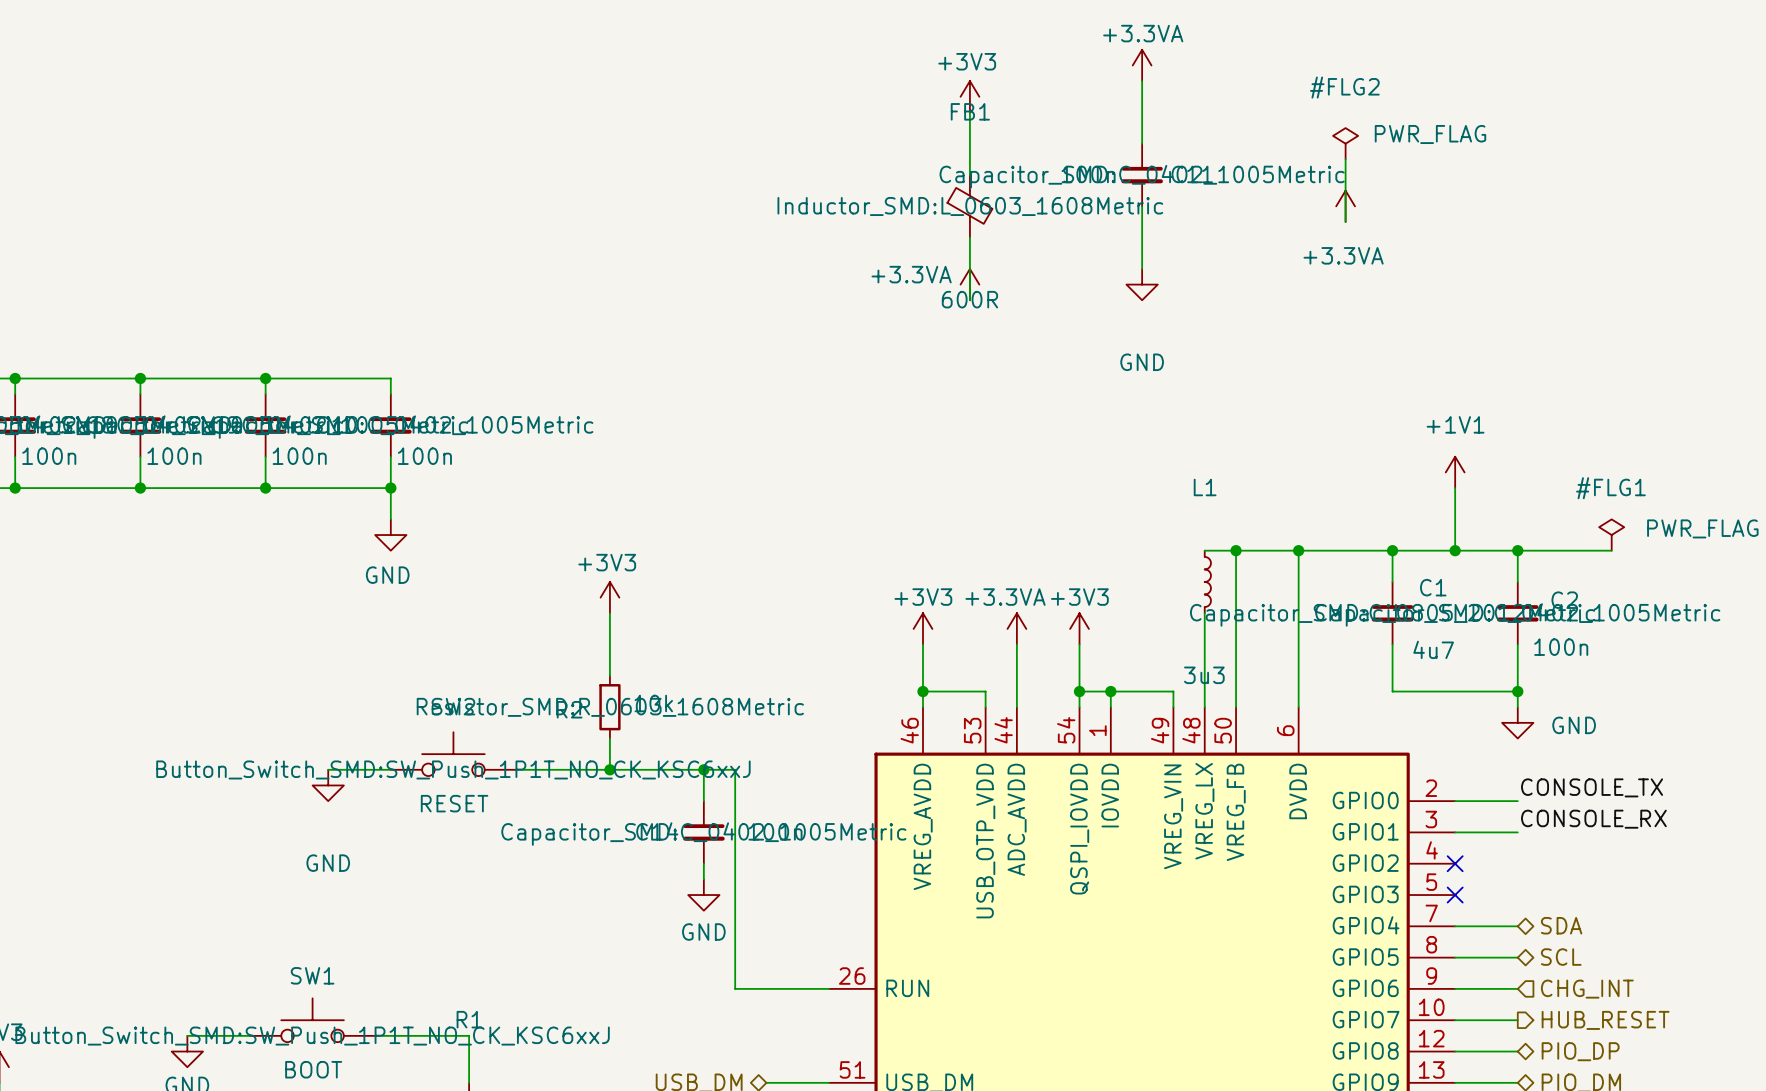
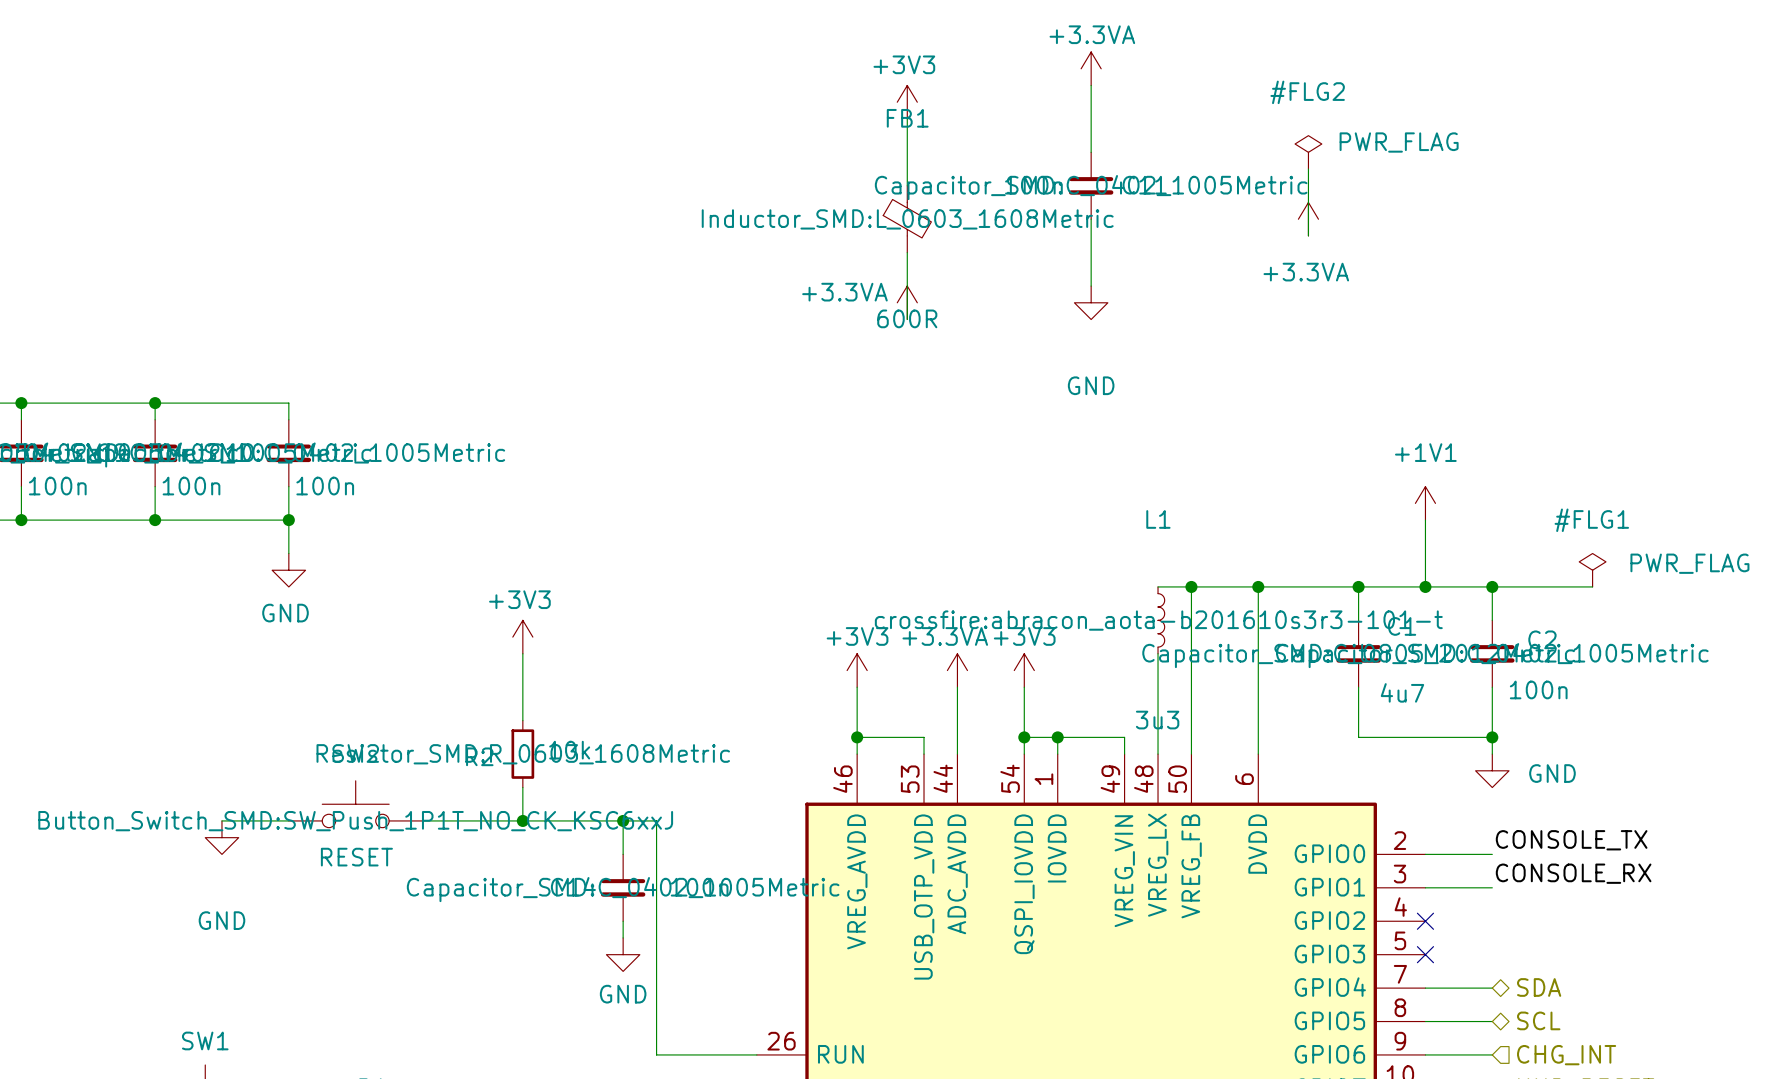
L1 text: none -> crossfire:abracon_aota-b201610s3r3-101-t (1158, 620)

